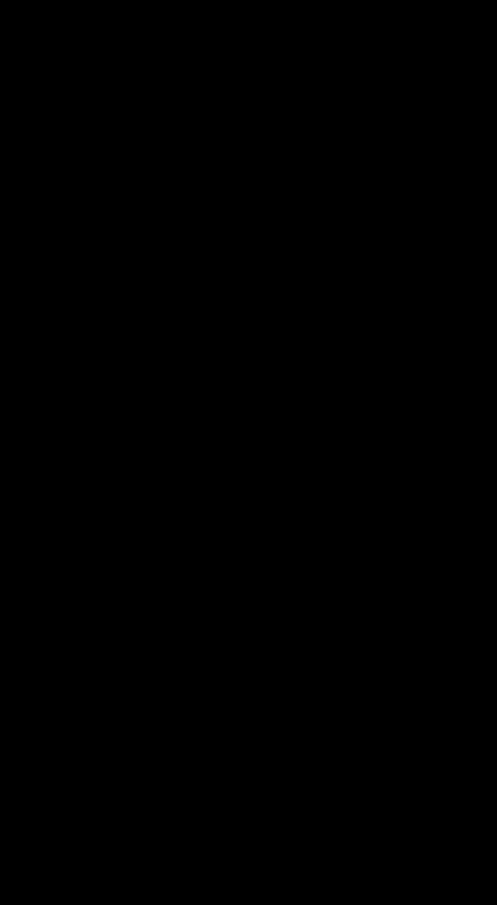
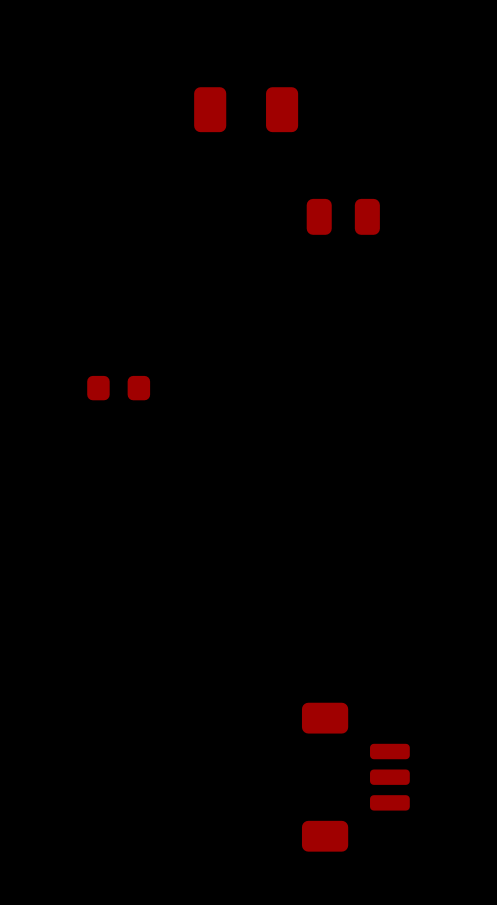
part: none -> (246, 109)
part: none -> (343, 216)
part: none -> (118, 388)
part: none -> (355, 777)

